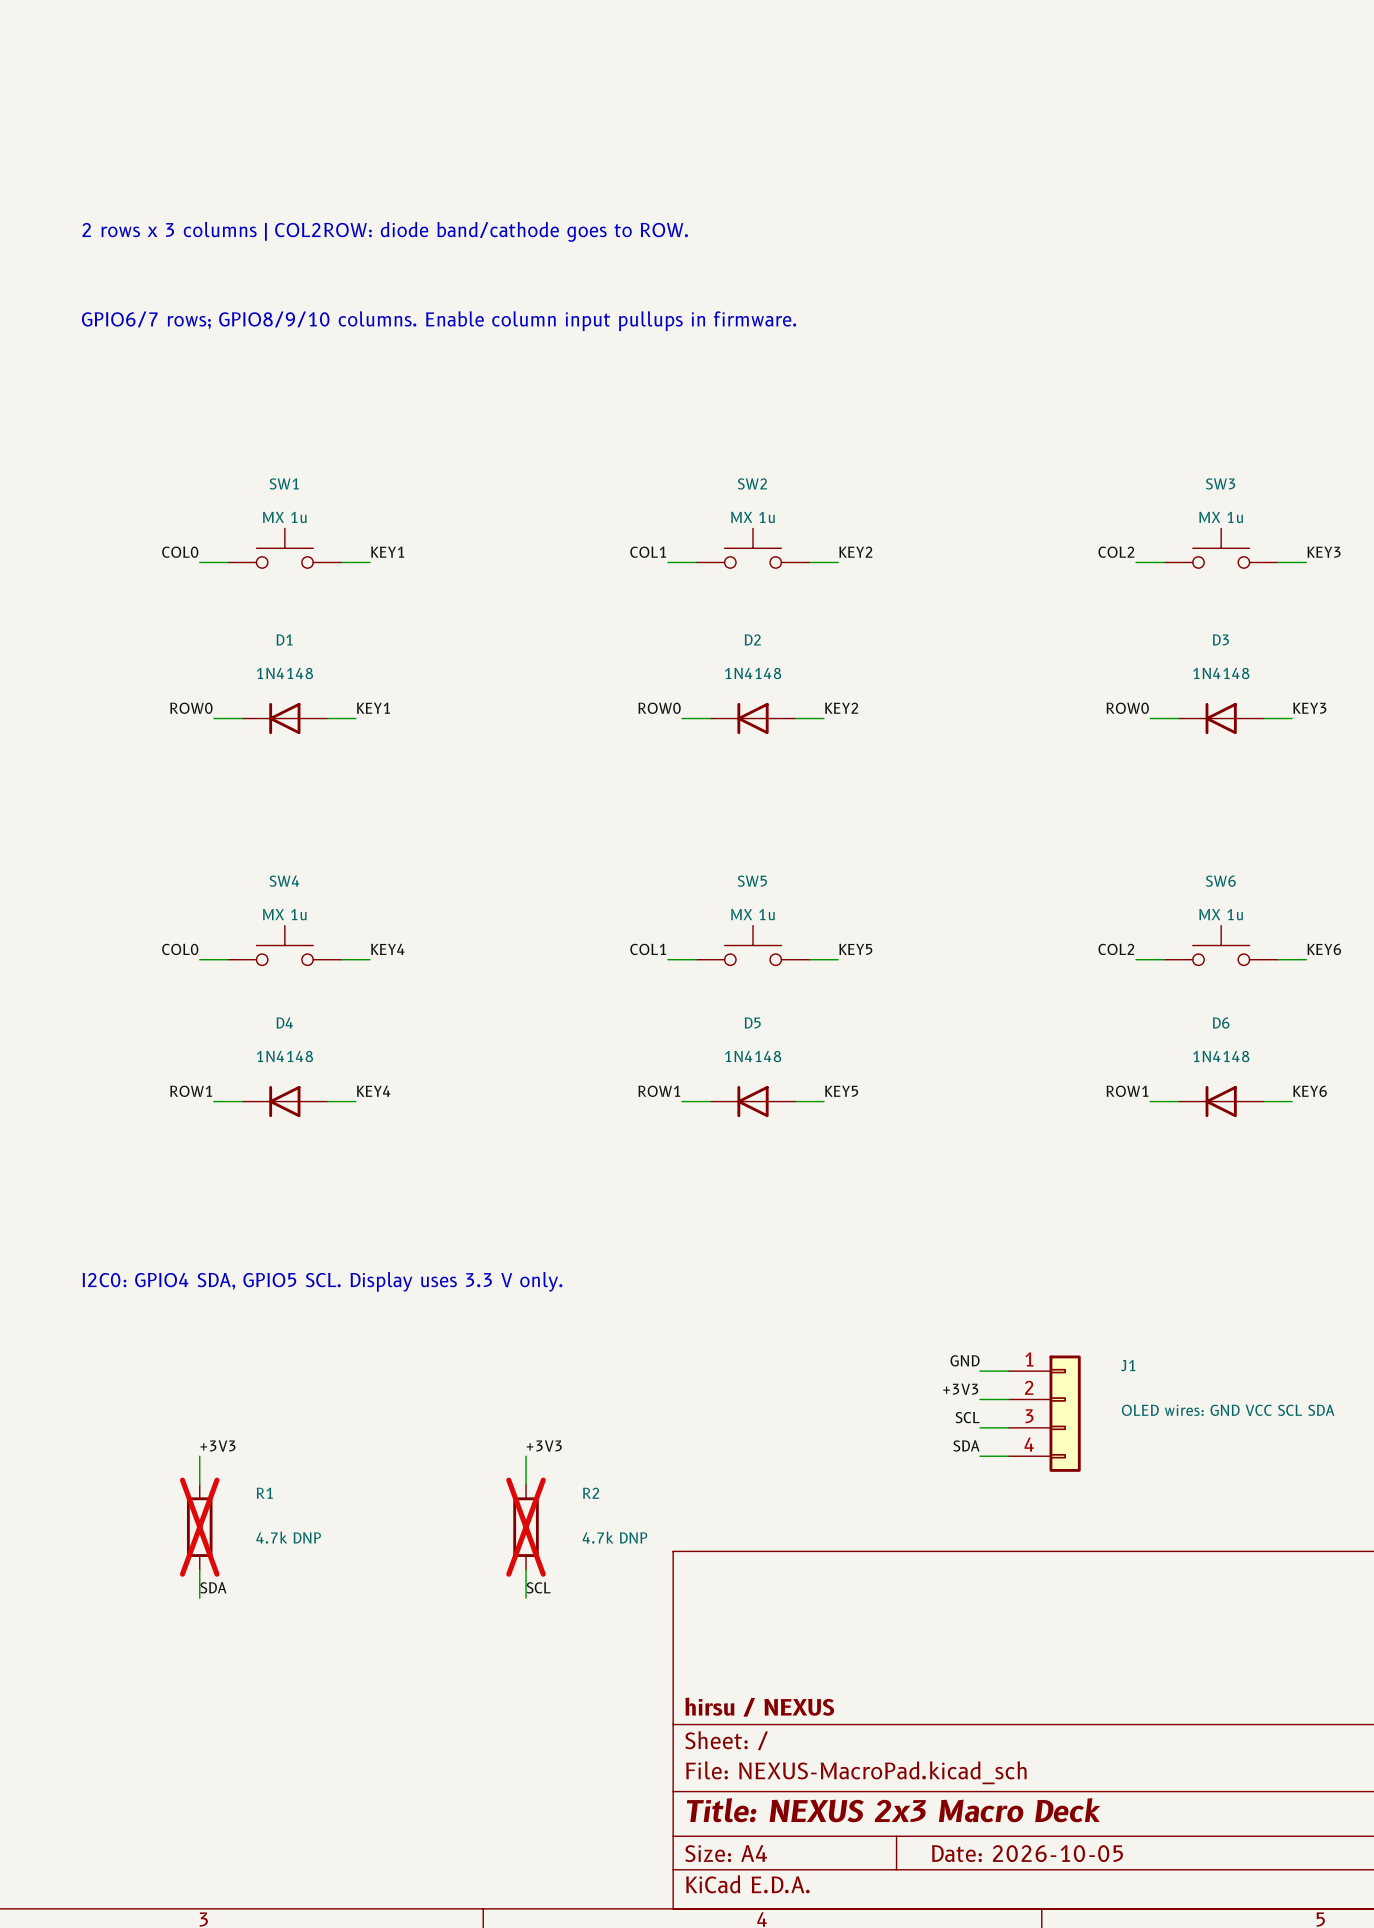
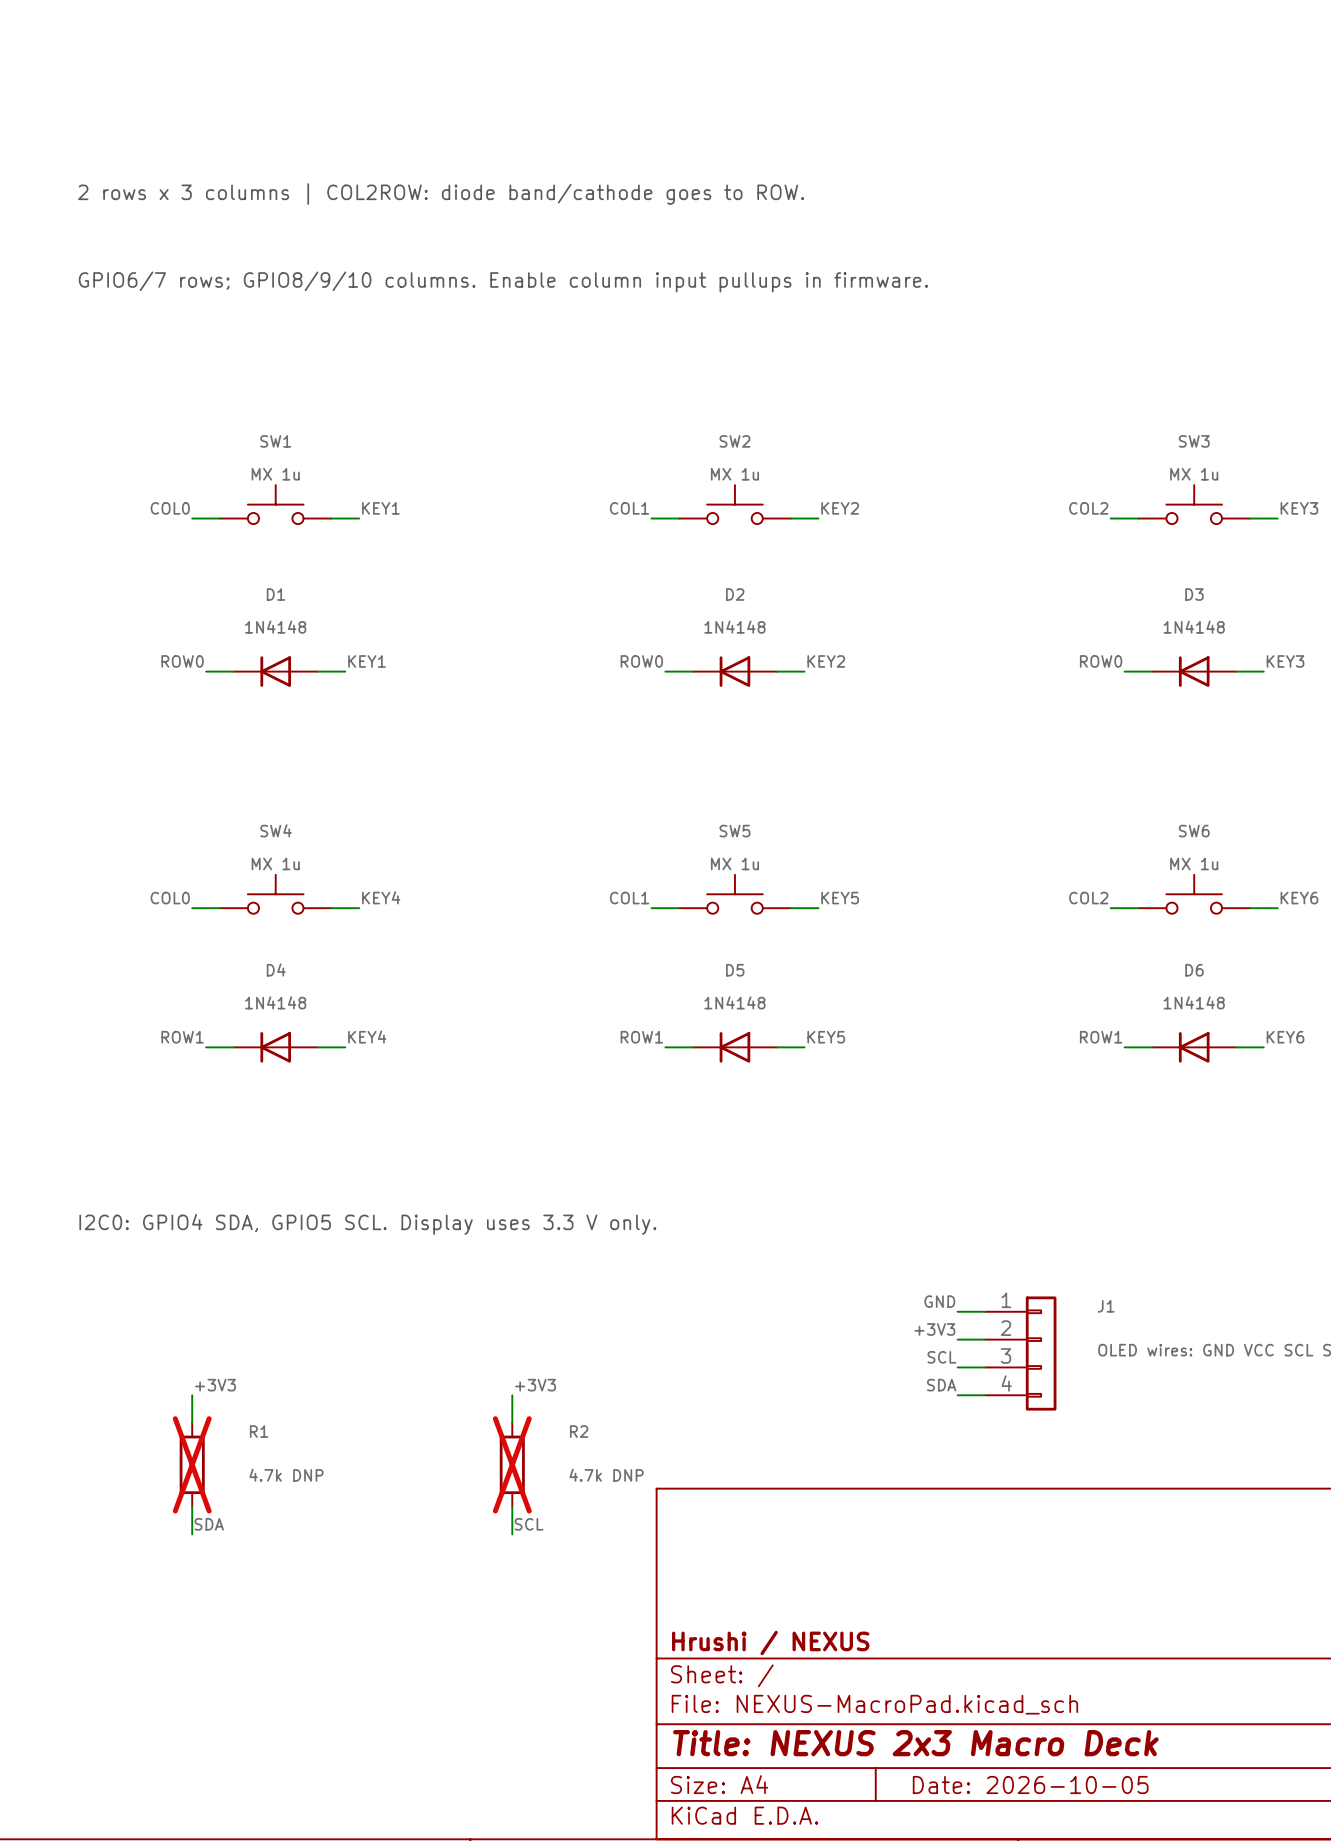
title block: hirsu / NEXUS (759, 1707) -> Hrushi / NEXUS (770, 1643)

